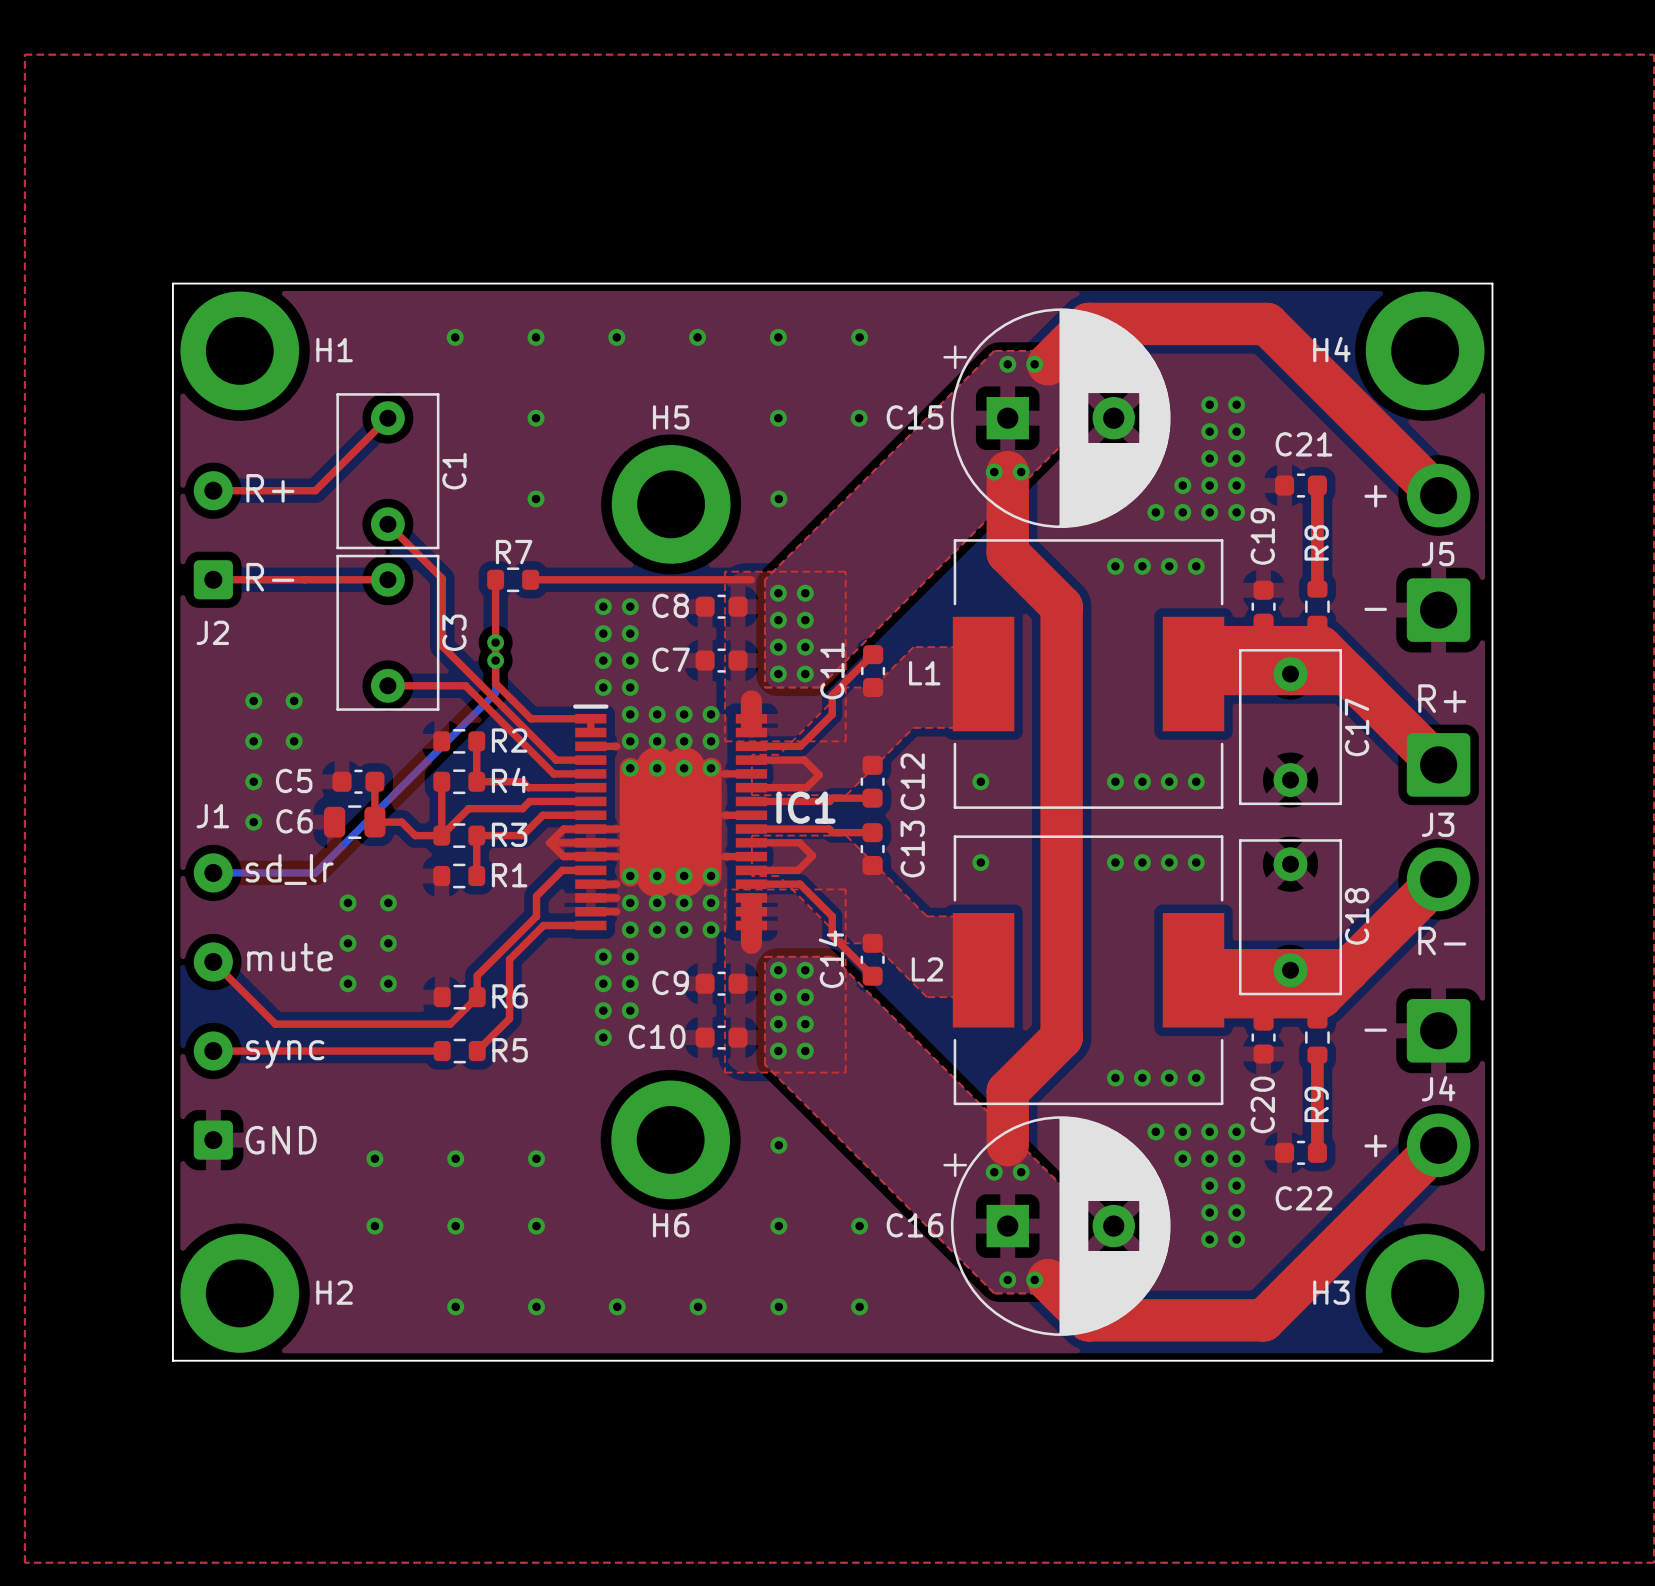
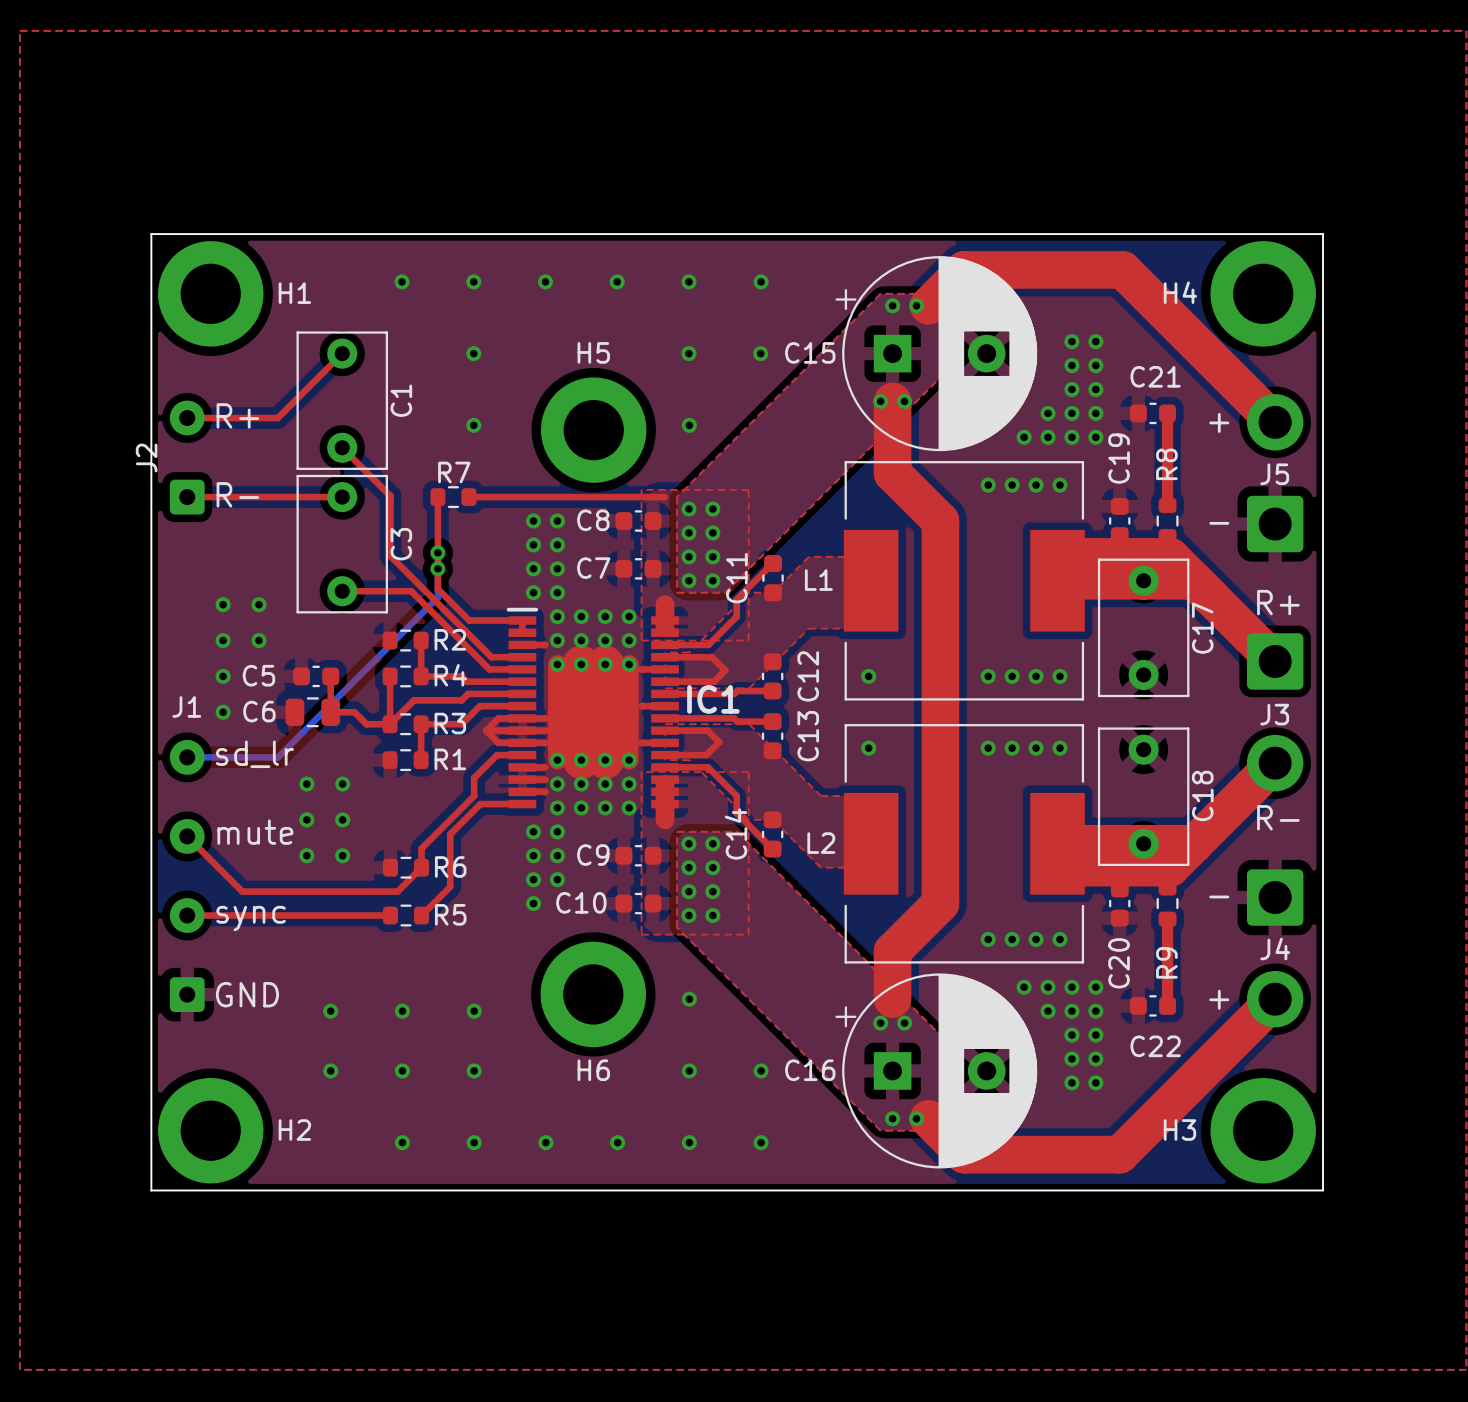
J2 name rotation: 0° (212, 632) -> 90° counterclockwise (146, 458)
J2 name position: J2 (212, 632) -> J2 (146, 458)

